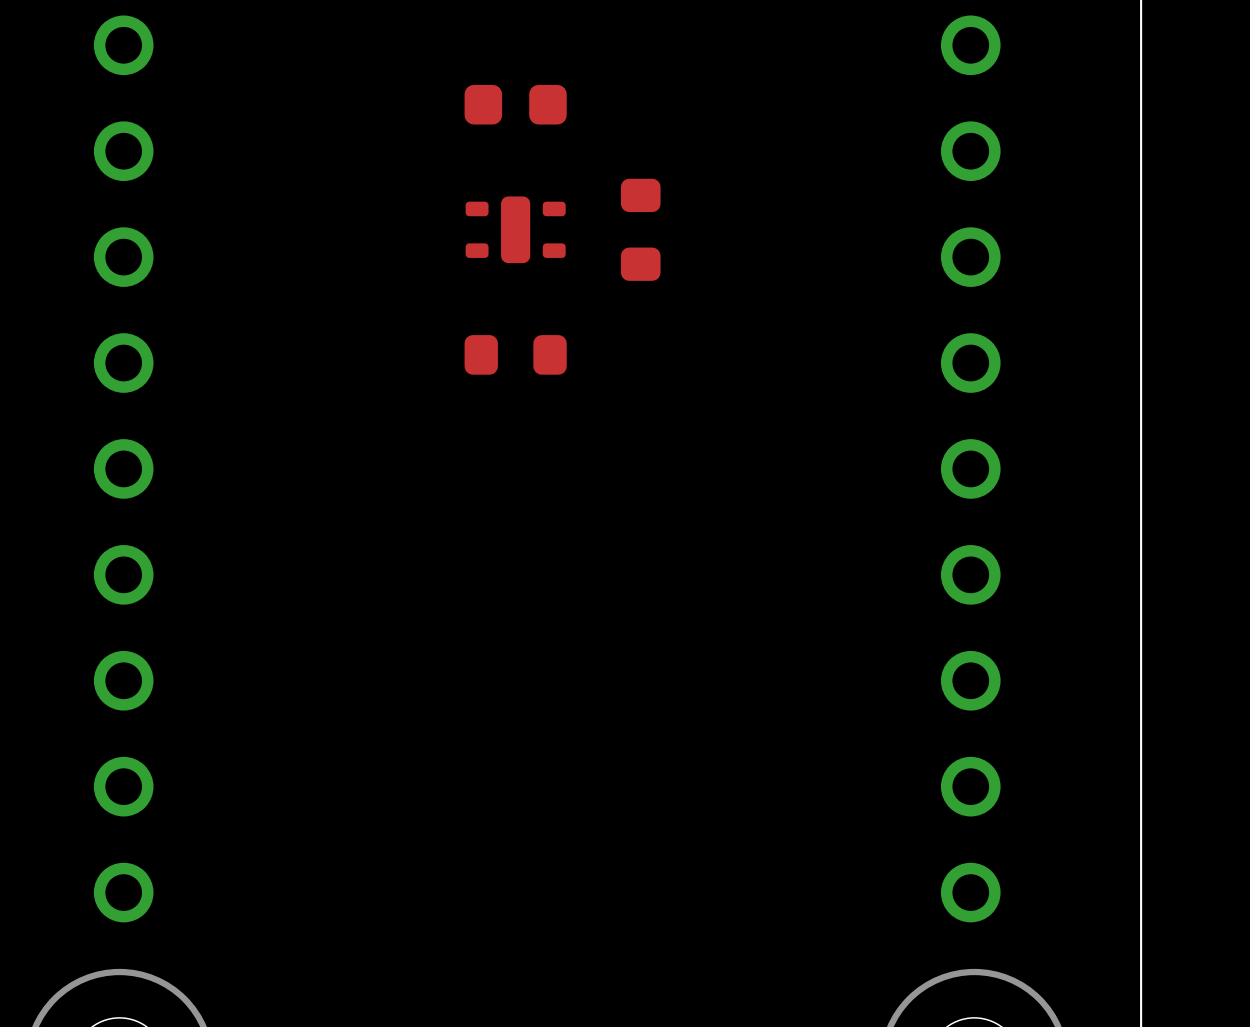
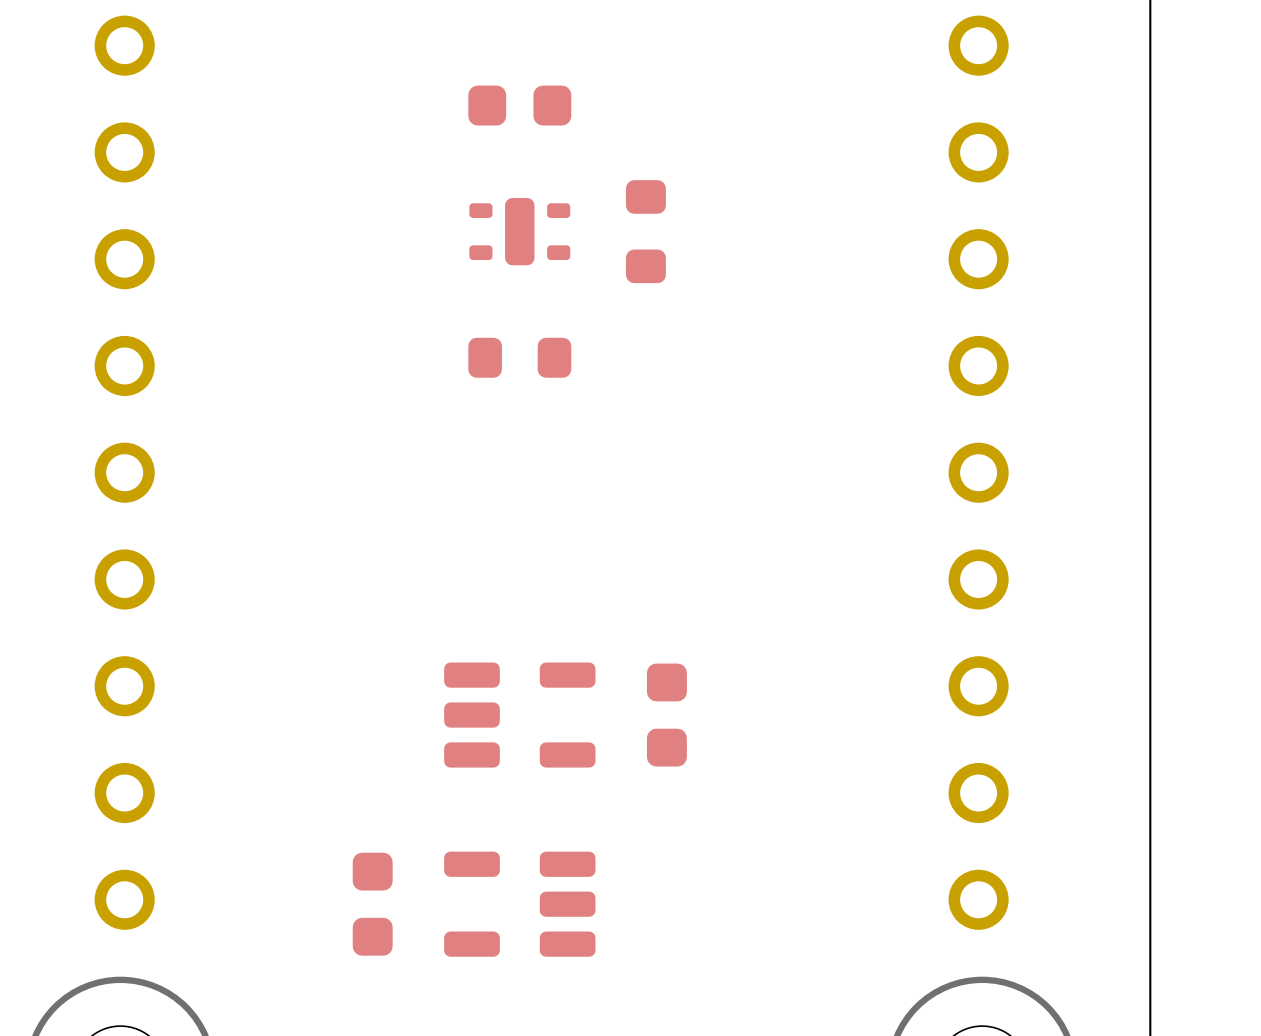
part: none -> (519, 715)
part: none -> (666, 715)
part: none -> (372, 904)
part: none -> (519, 904)

